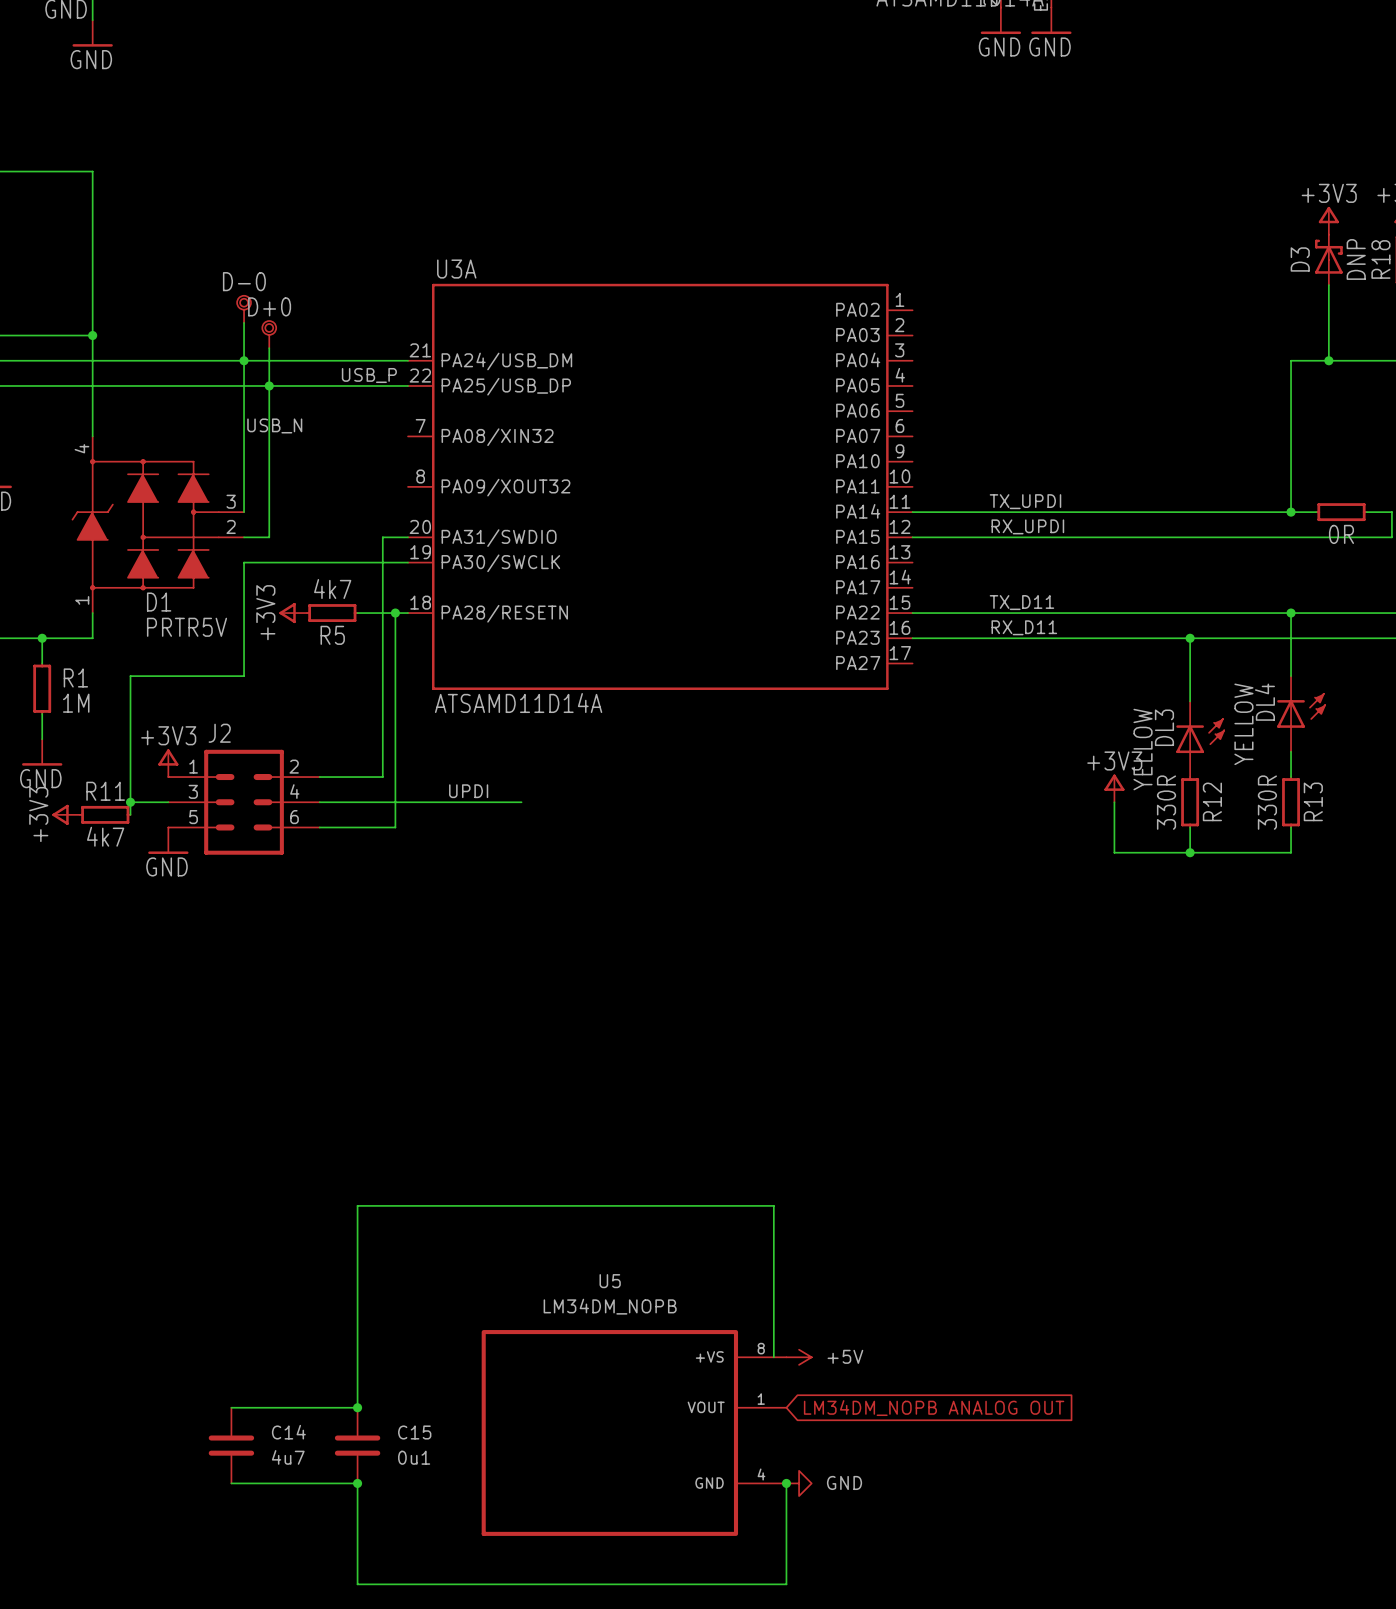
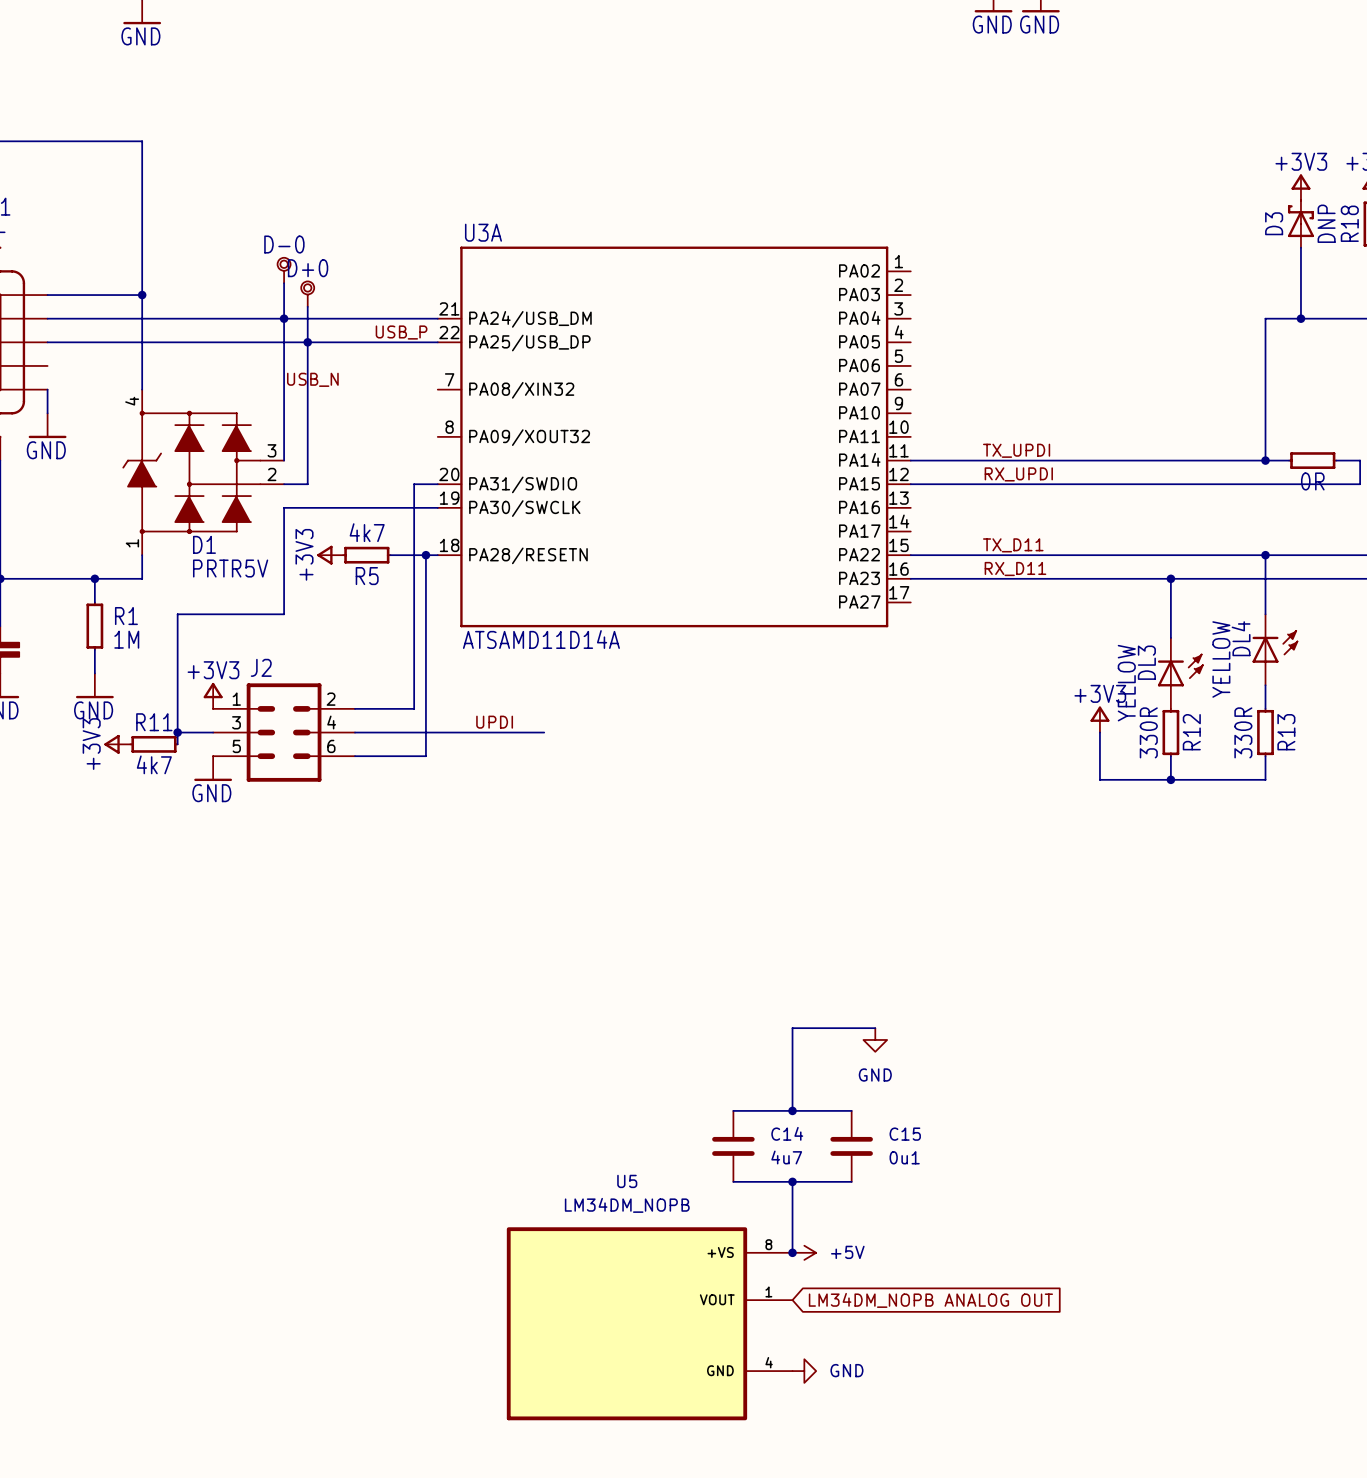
wire: none -> (875, 1028) (792, 1028) (792, 1110)
power symbol: none -> GND (875, 1039)
wire: (723, 1205) (357, 1205) (357, 1407) (231, 1407) -> none
wire: (773, 1205) (773, 1357) -> (780, 1110) (851, 1110)
junction: none -> (792, 1110)
wire: none -> (733, 1181) (851, 1181)
wire: none -> (792, 1181) (792, 1252)
junction: none -> (792, 1181)
junction: none -> (792, 1252)
junction: (357, 1407) -> none
C14 position: (231, 1445) -> (733, 1146)
C15 position: (357, 1445) -> (851, 1146)
wire: (231, 1483) (357, 1483) (357, 1584) (786, 1584) (786, 1483) -> none
junction: (357, 1483) -> none
junction: (786, 1483) -> none

